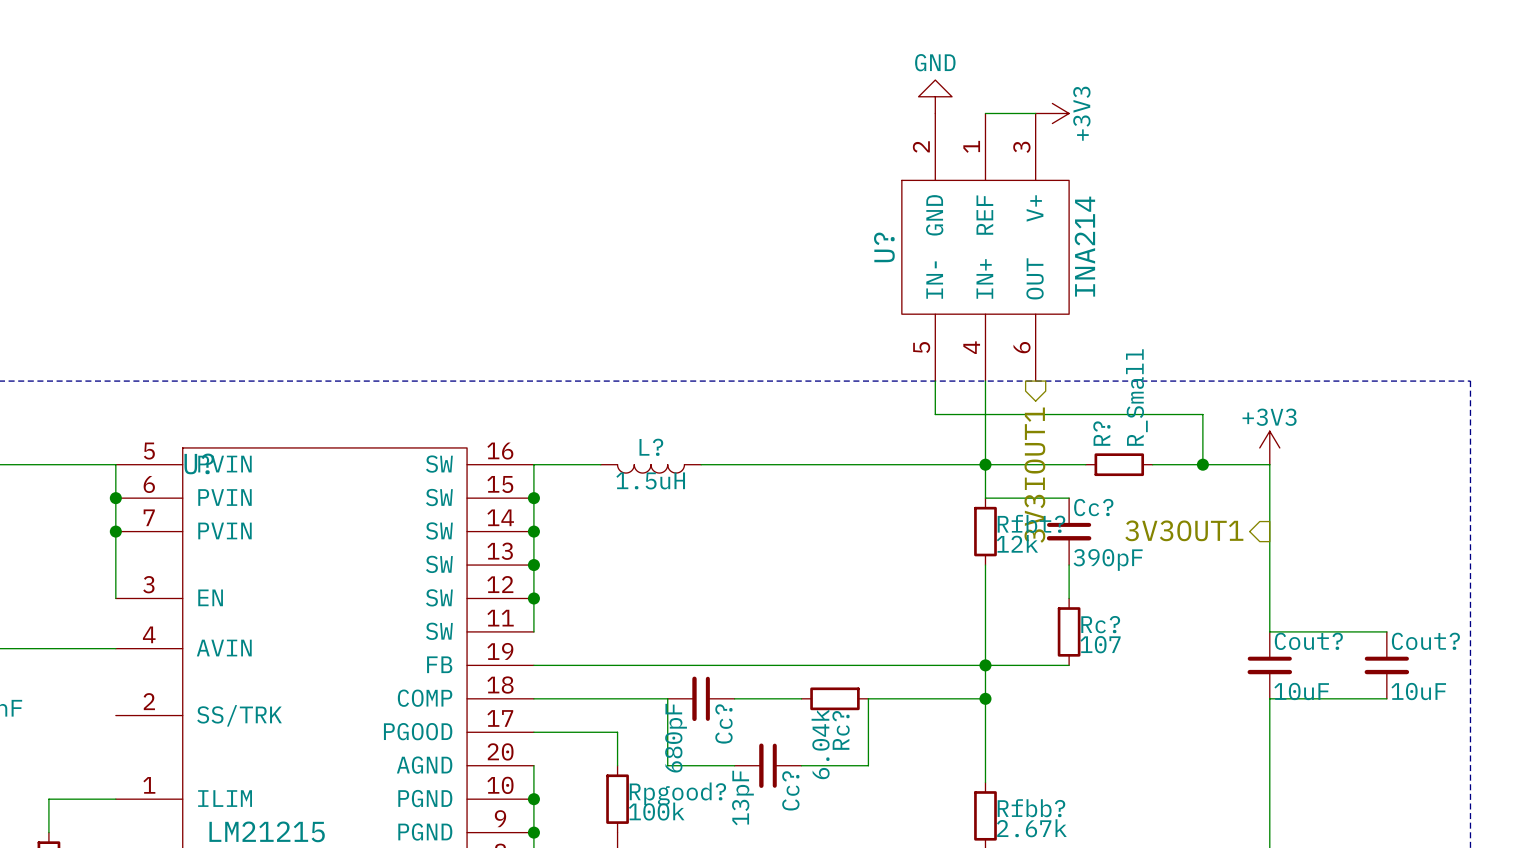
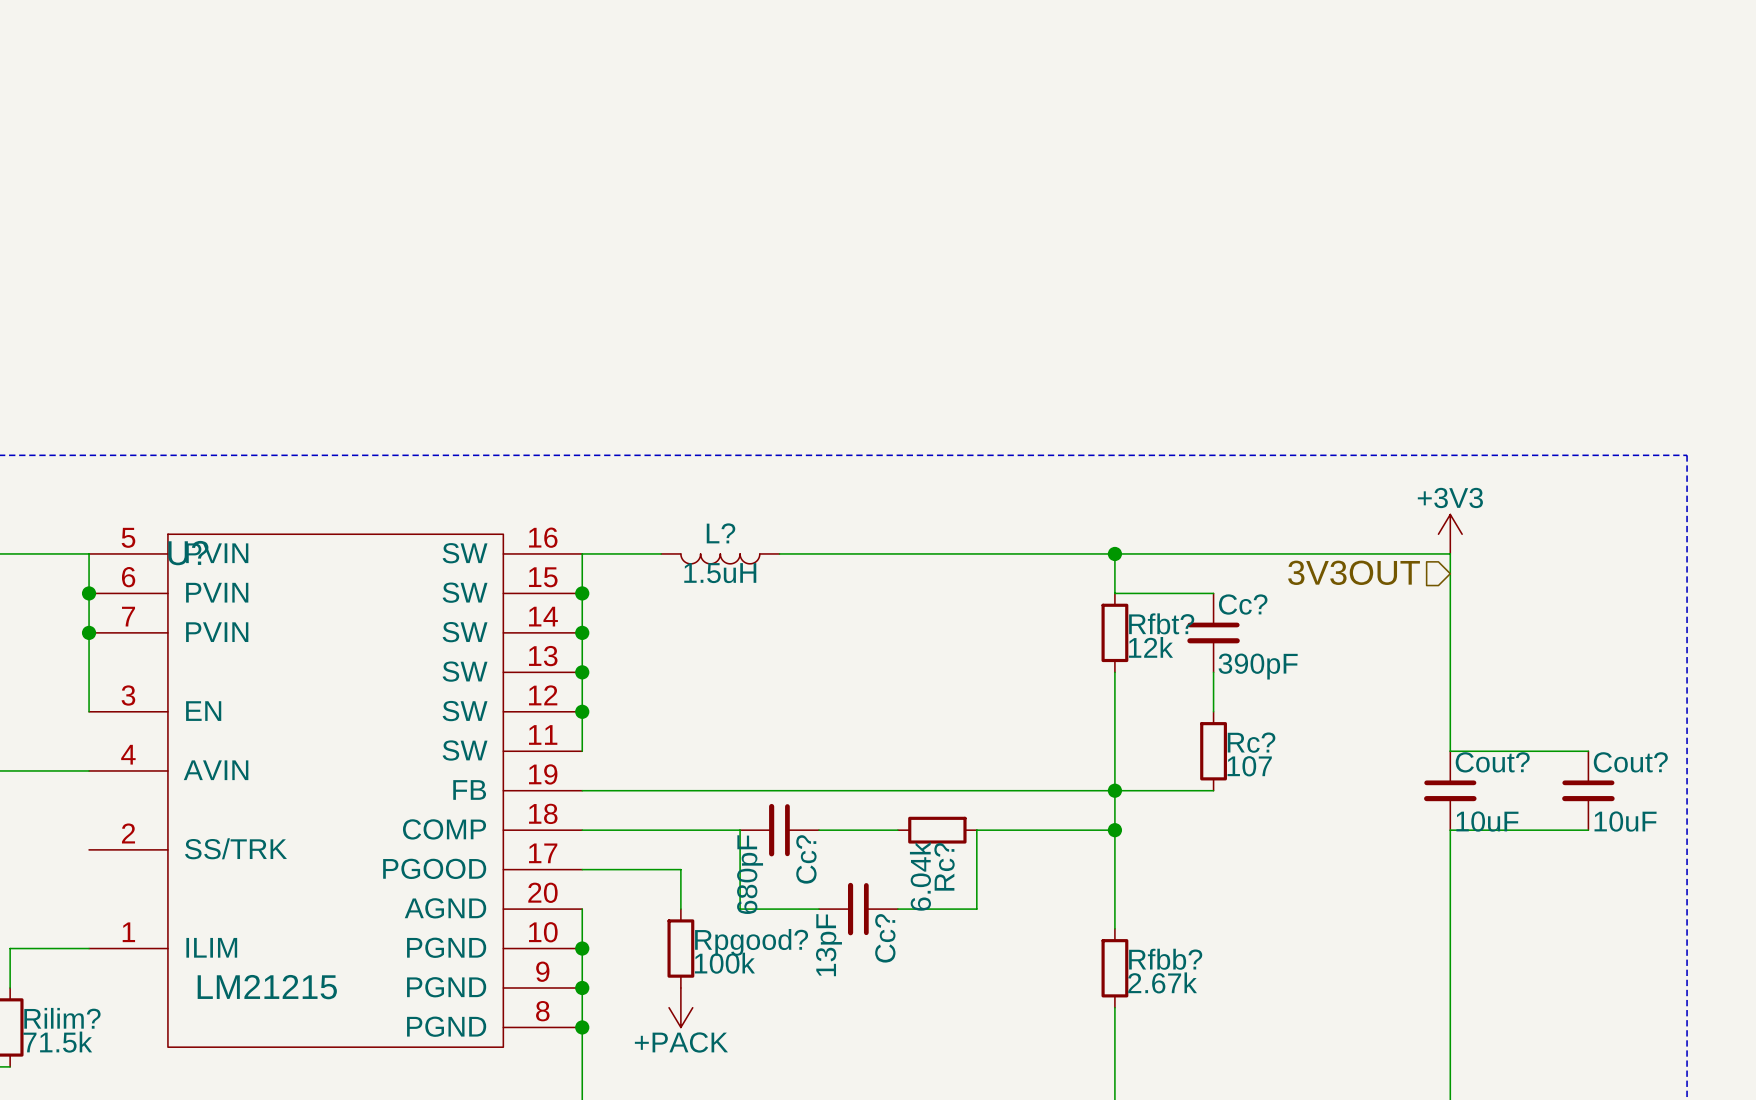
power symbol: GND (935, 96) -> none
wire: (985, 113) (1035, 113) -> none
power symbol: +3V3 (1052, 113) -> none
U?: INA214 (985, 247) -> none
wire: (935, 381) (935, 414) (1202, 414) (1202, 464) -> none
wire: (985, 381) (985, 464) -> none
wire: none -> (1233, 553) (1312, 553)
R?: R_Small (1119, 464) -> none
junction: (1202, 464) -> none
hierarchical label: 3V3IOUT1 (1034, 475) -> none
hierarchical label: none -> 3V3OUT (1354, 572)
hierarchical label: 3V3OUT1 (1184, 530) -> none

